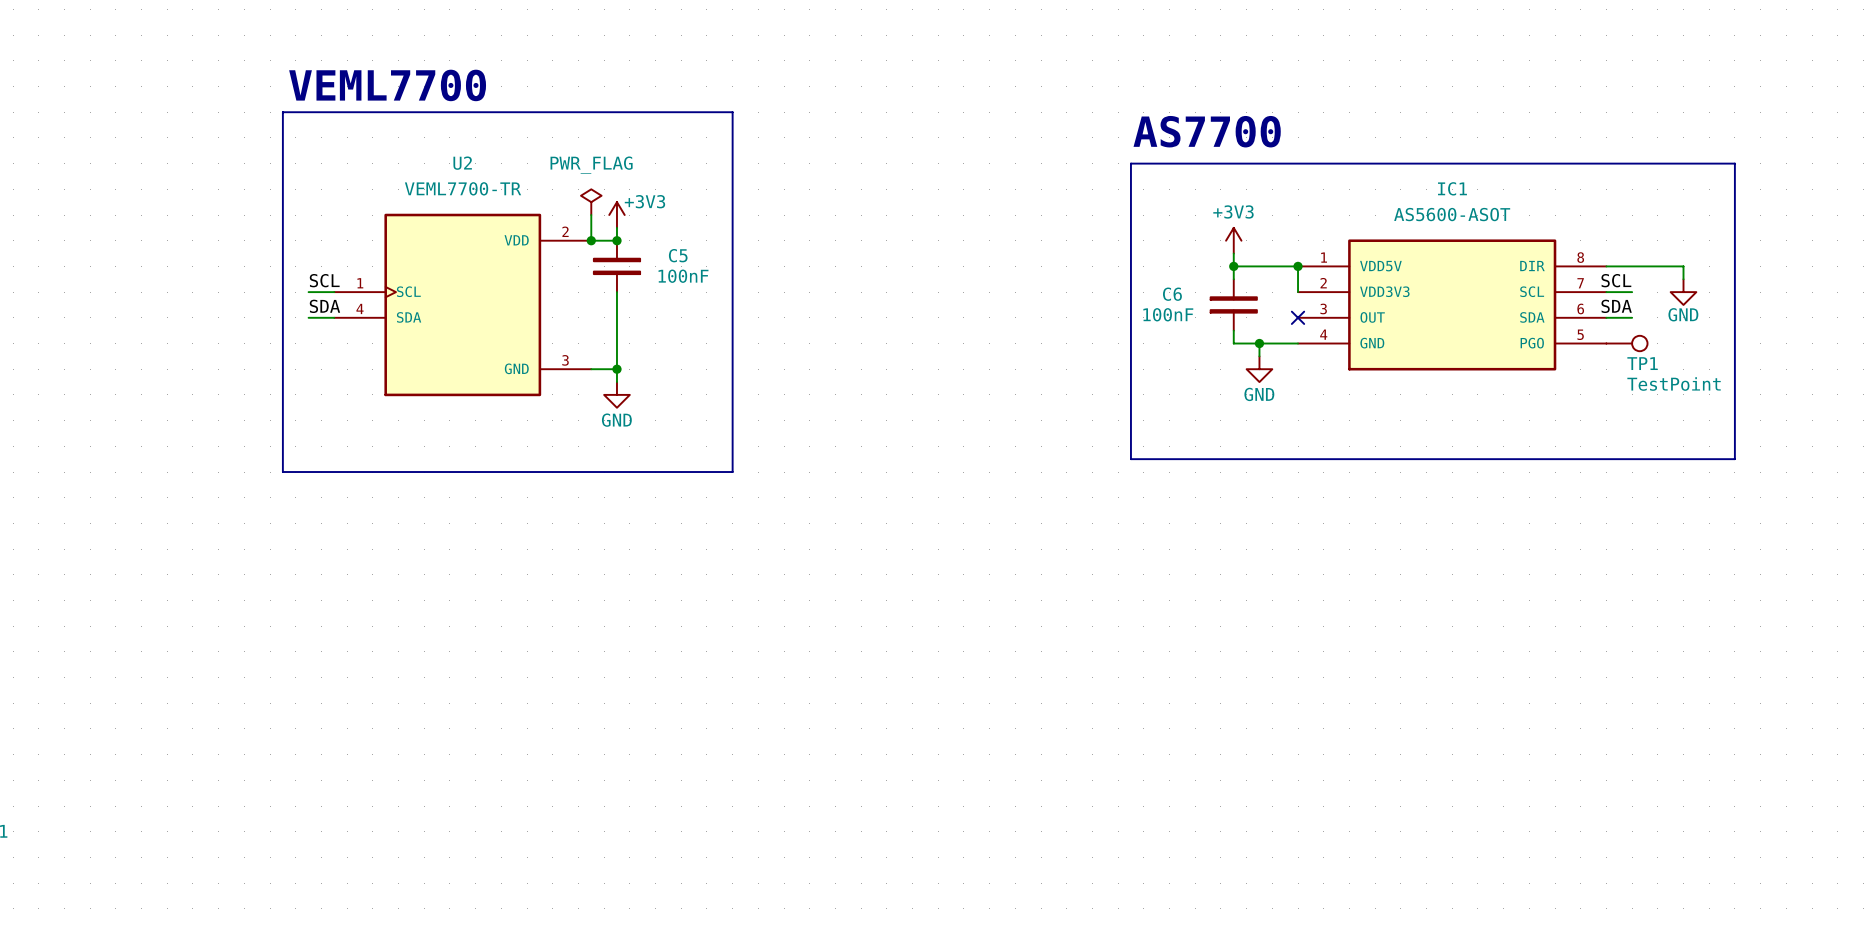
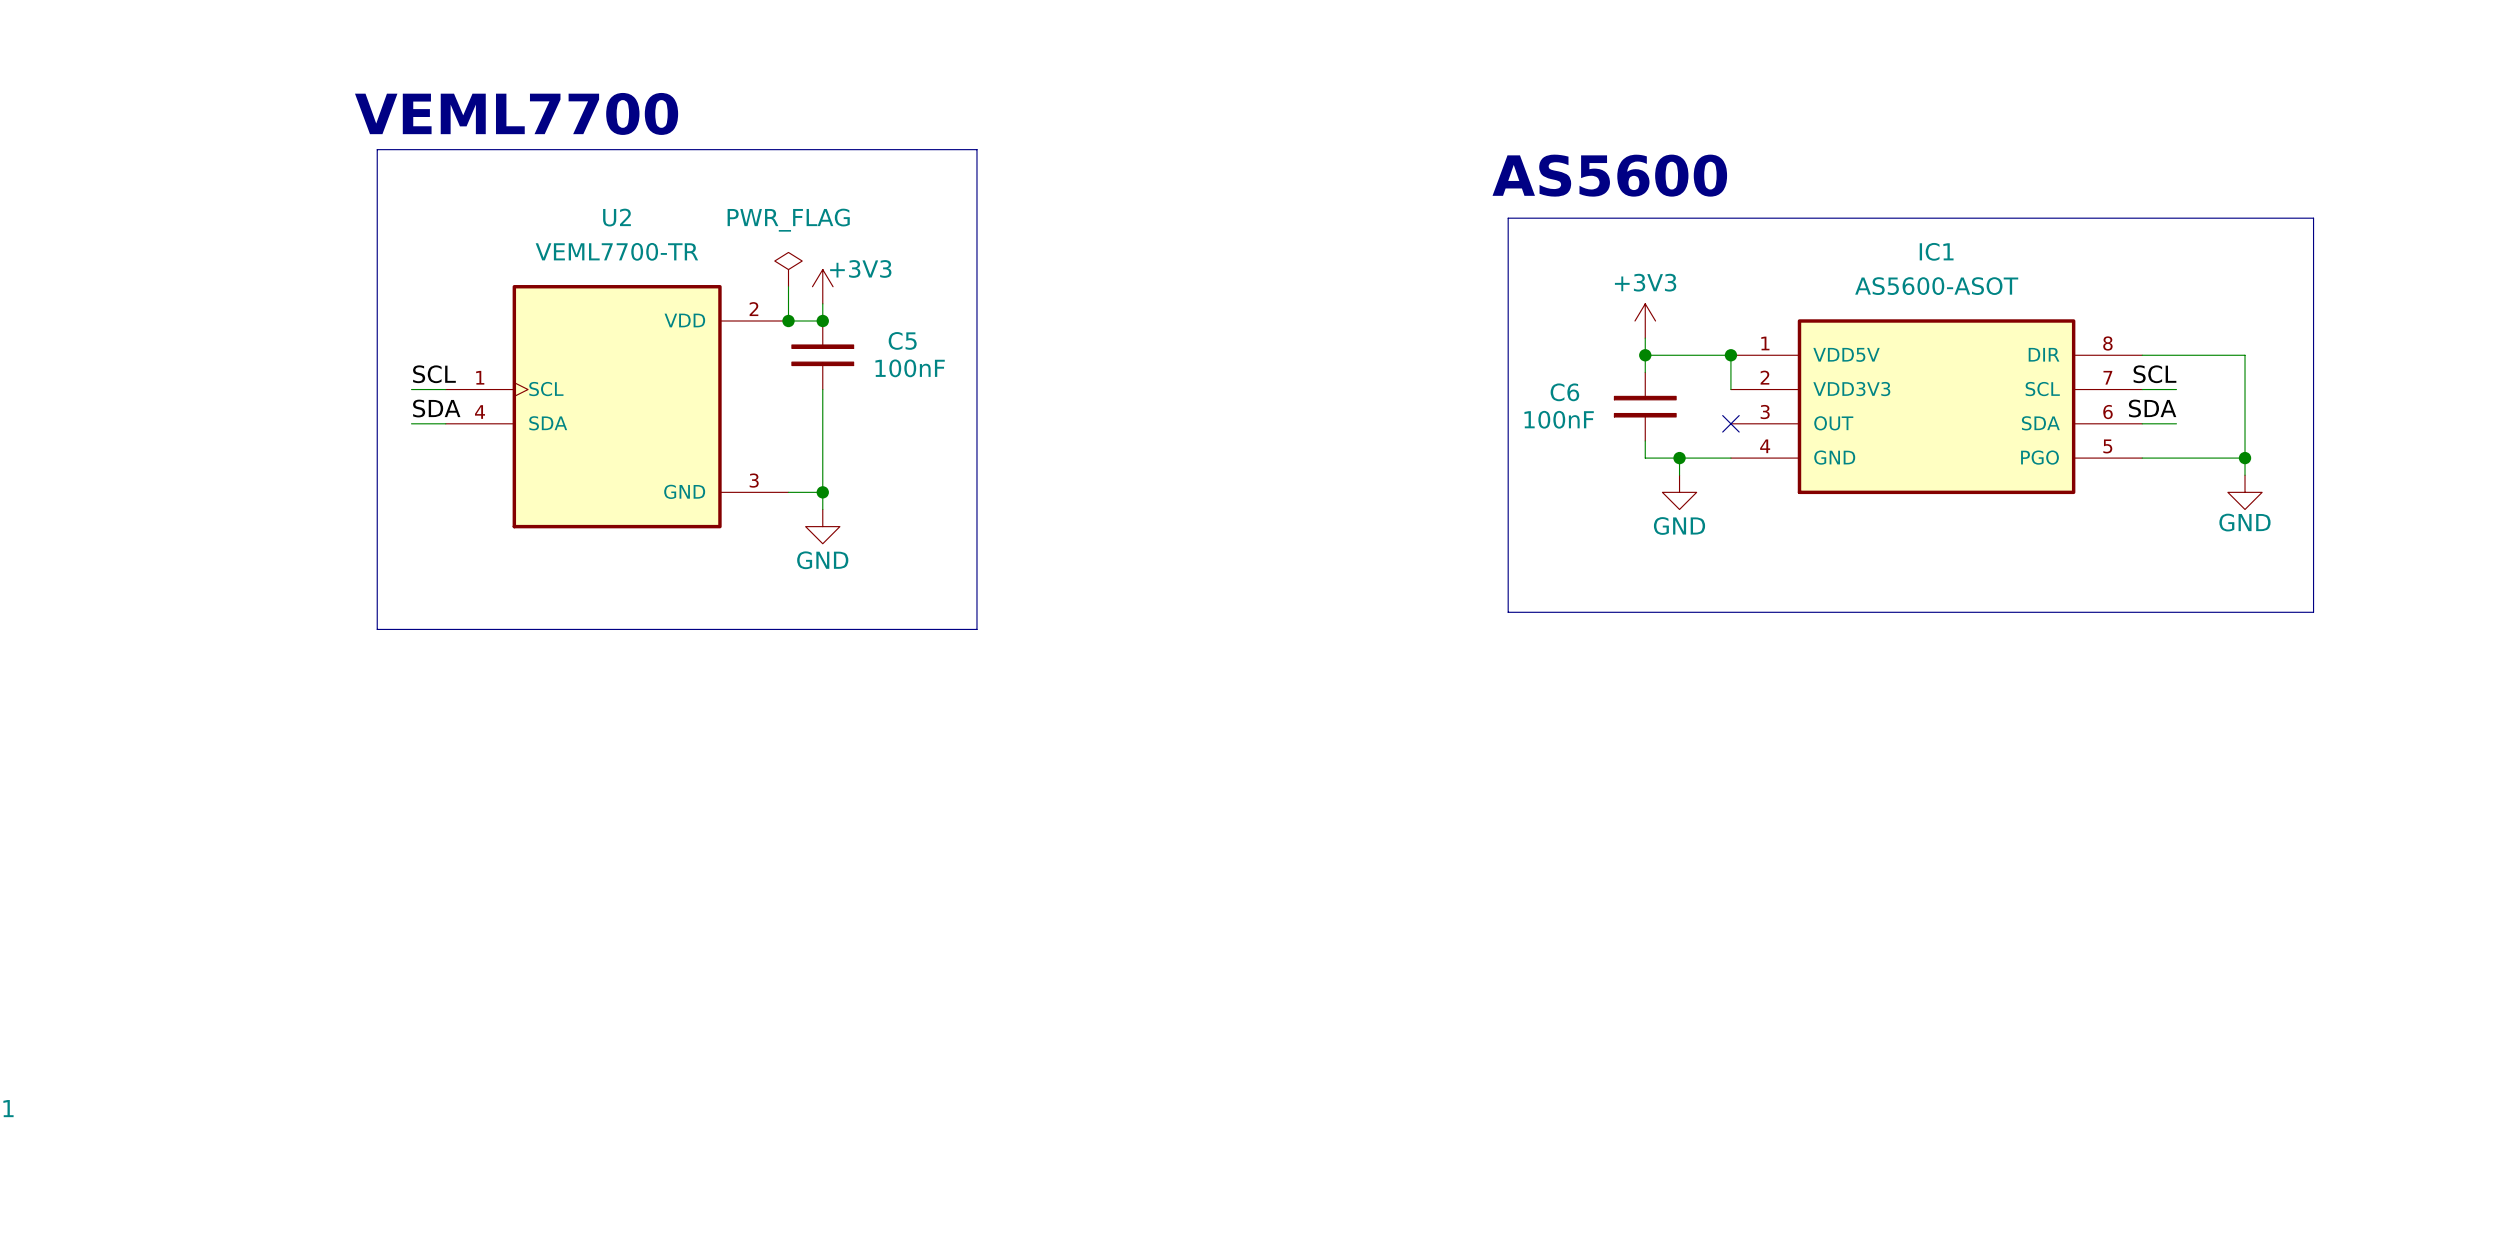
text: AS7700 (1207, 131) -> AS5600 (1609, 175)
wire: none -> (2245, 372) (2245, 475)
power symbol position: GND (1683, 292) -> GND (2245, 492)
wire: none -> (2142, 458) (2245, 458)
TP1: TestPoint (1626, 343) -> none
junction: none -> (2245, 458)

